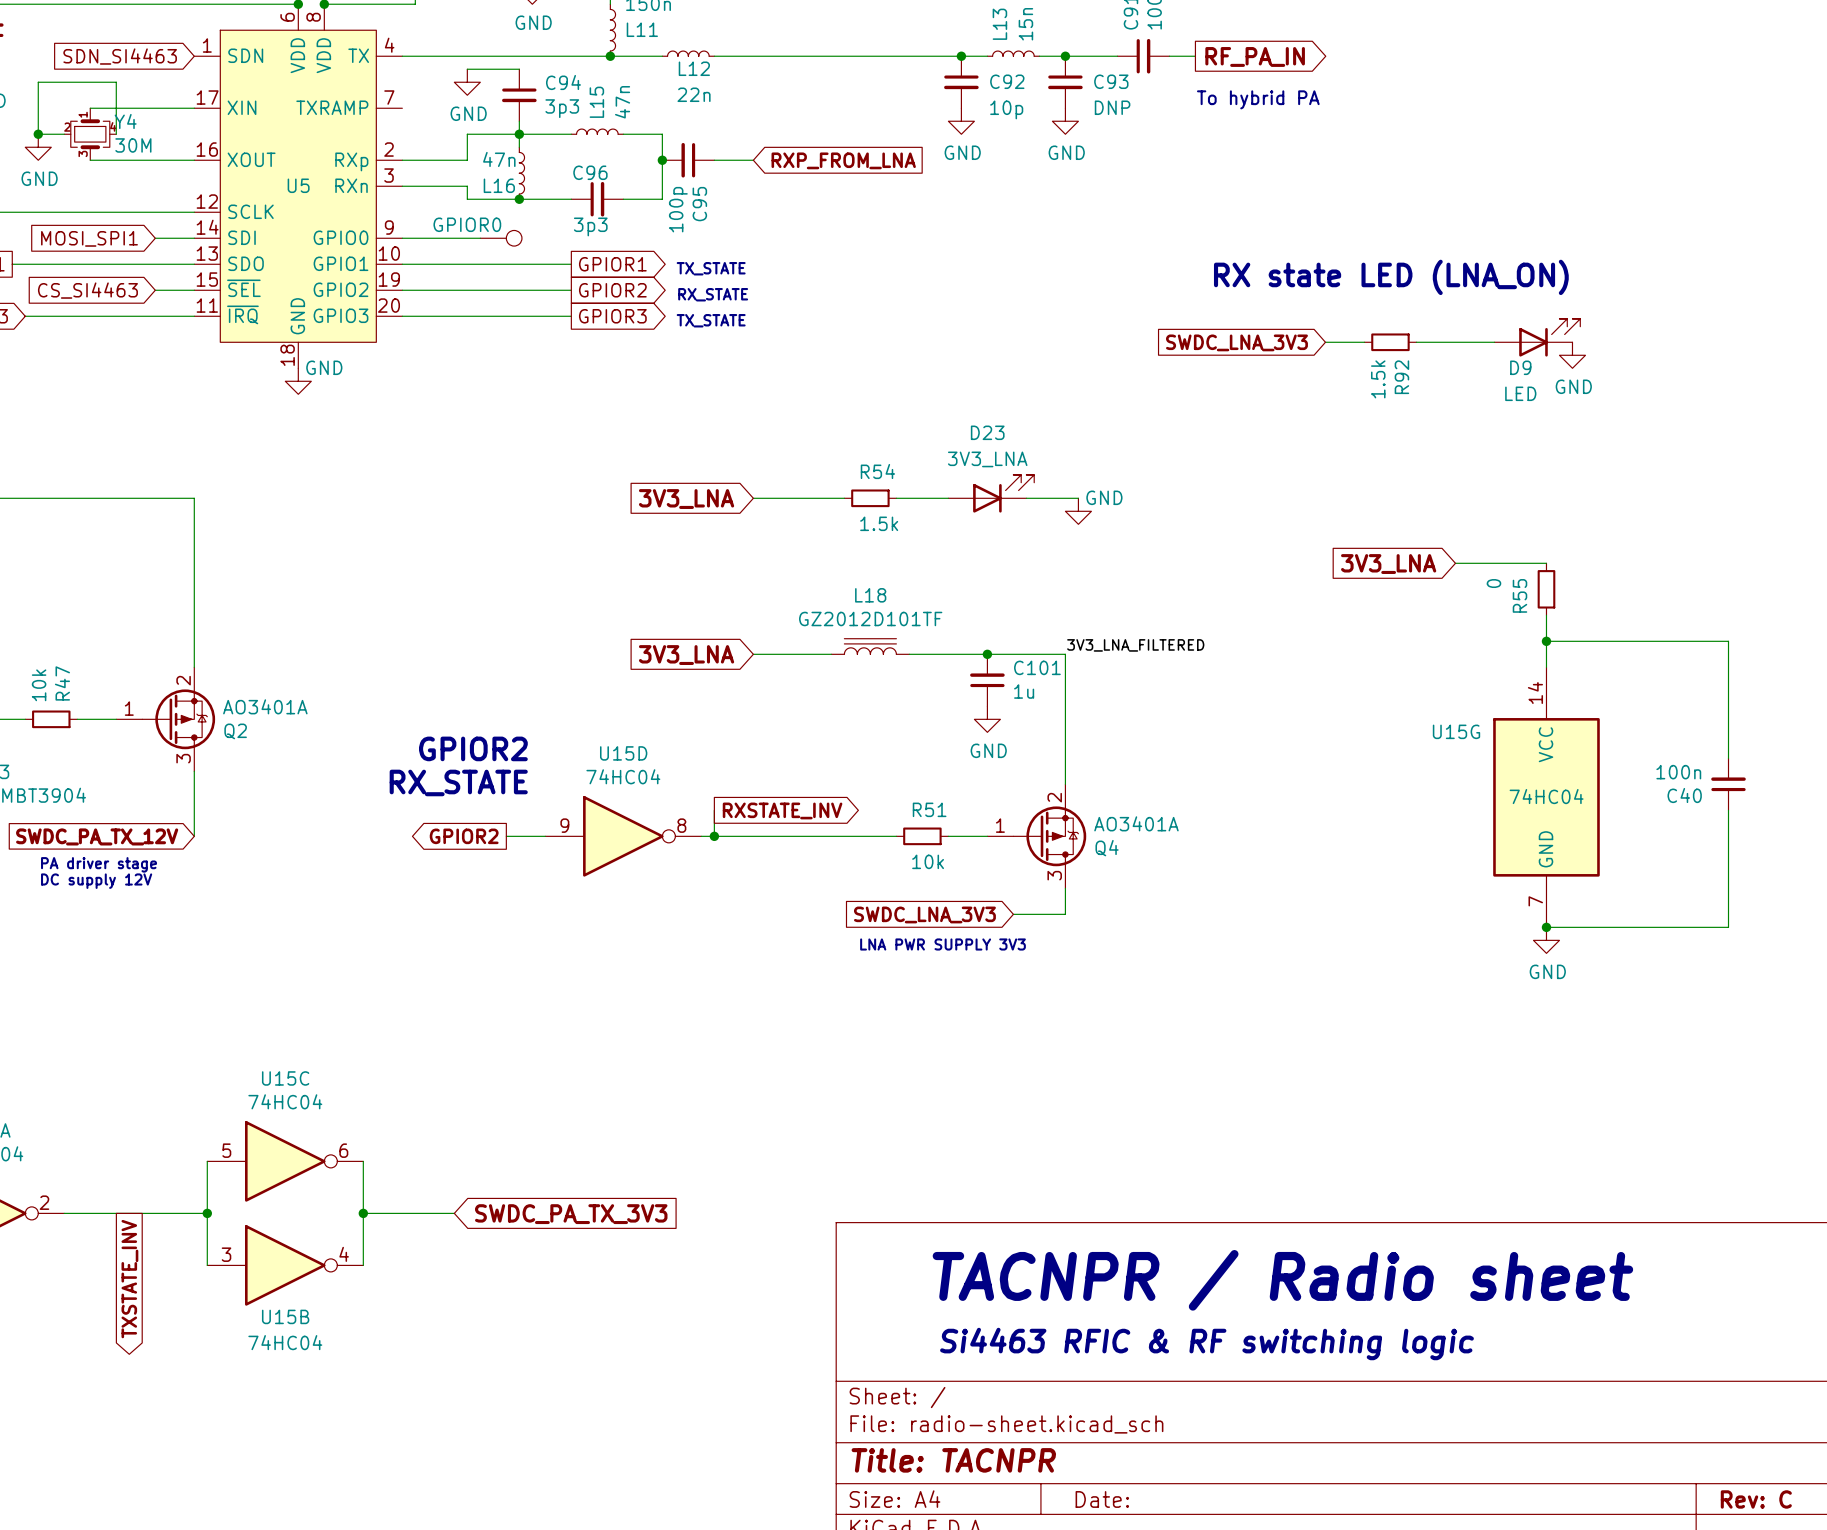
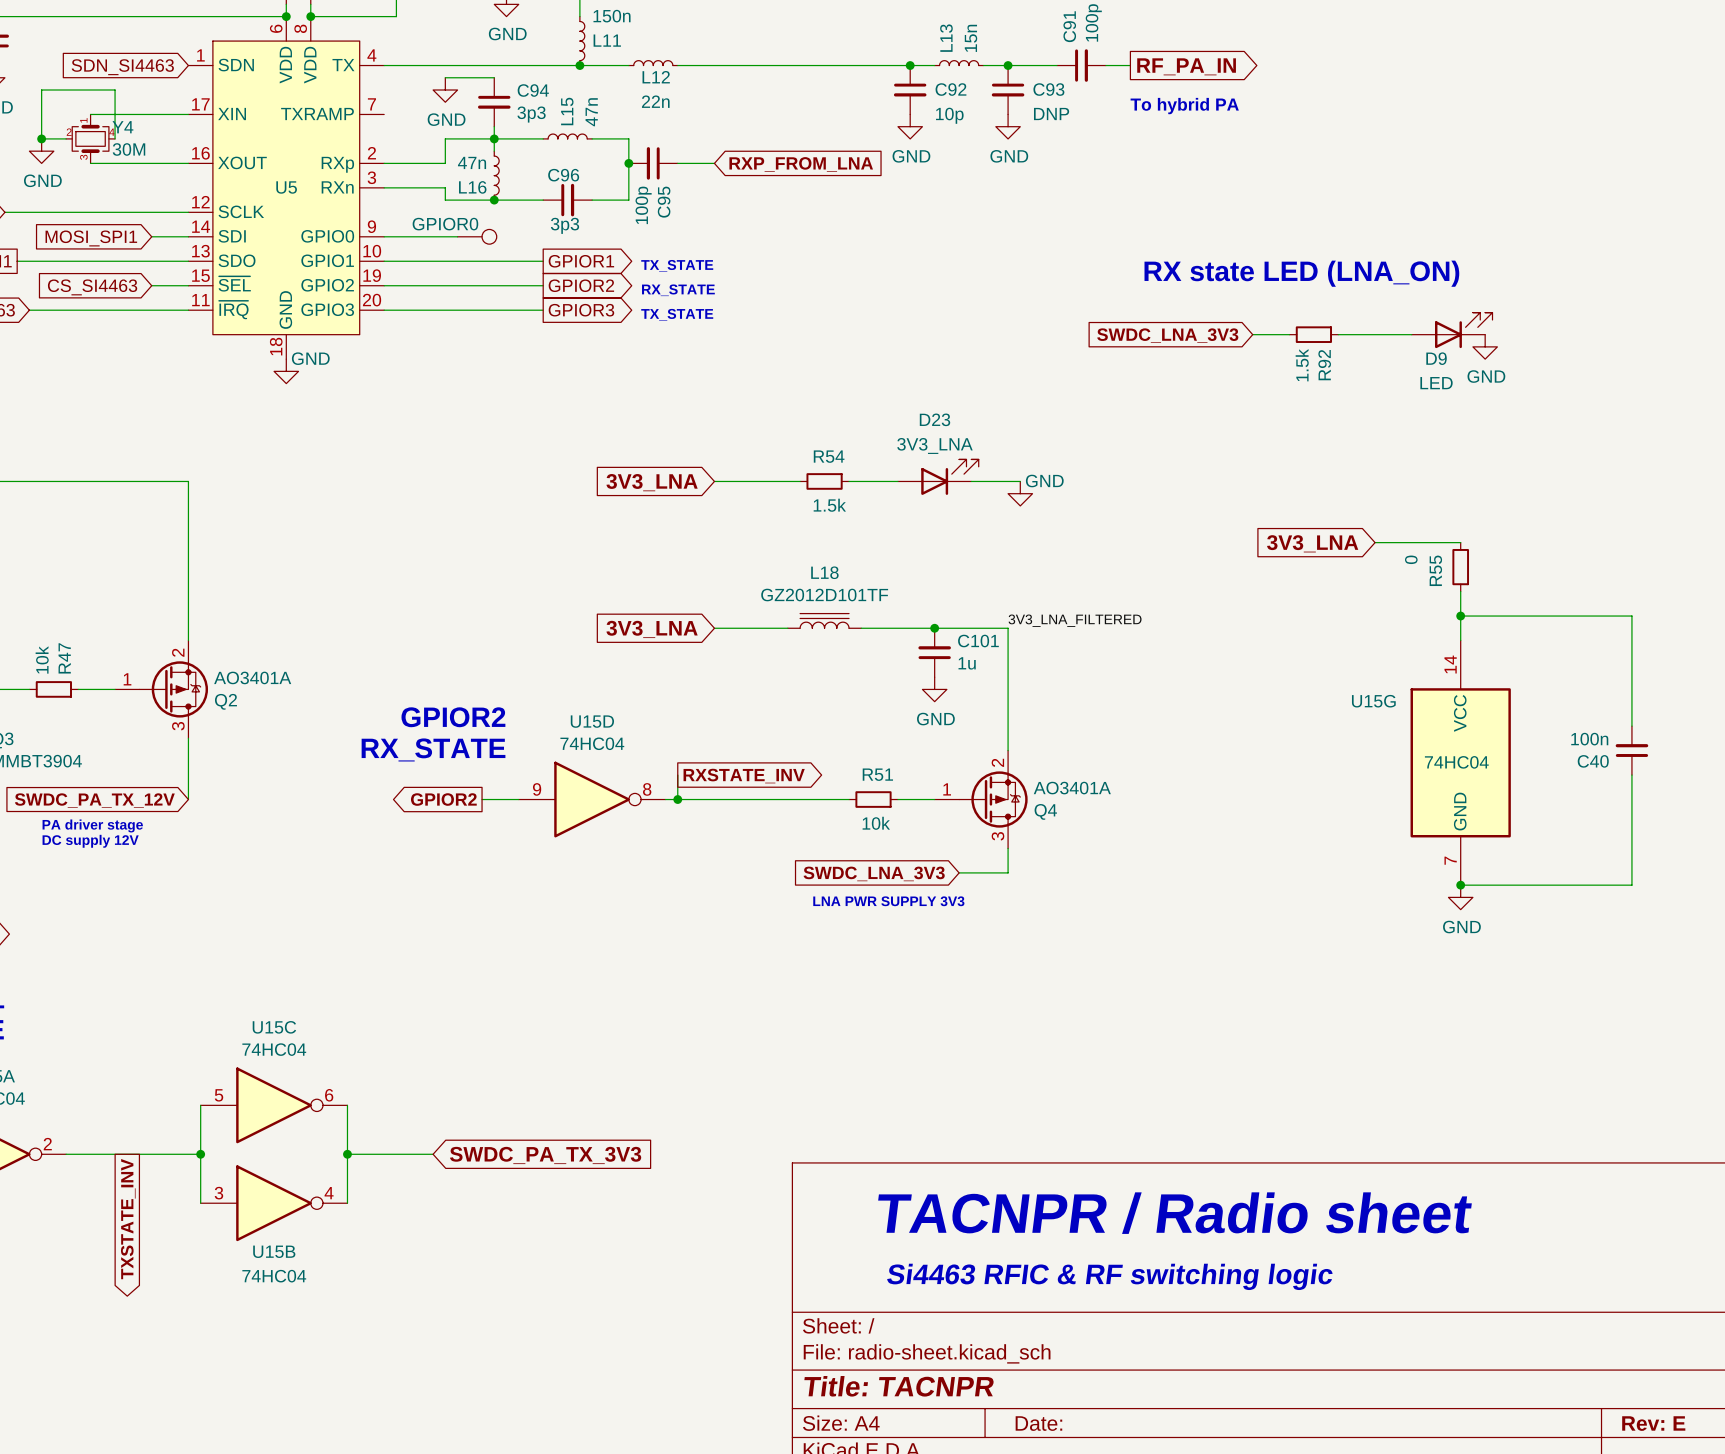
title block: Rev: C (1756, 1499) -> Rev: E (1653, 1423)

